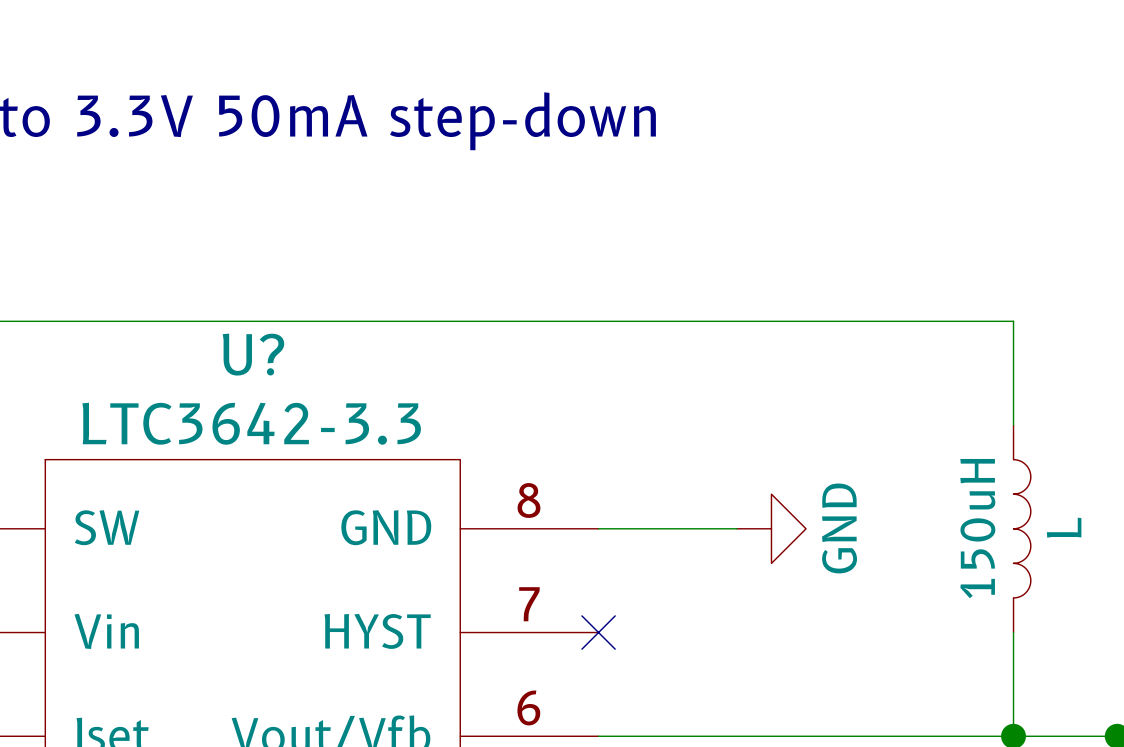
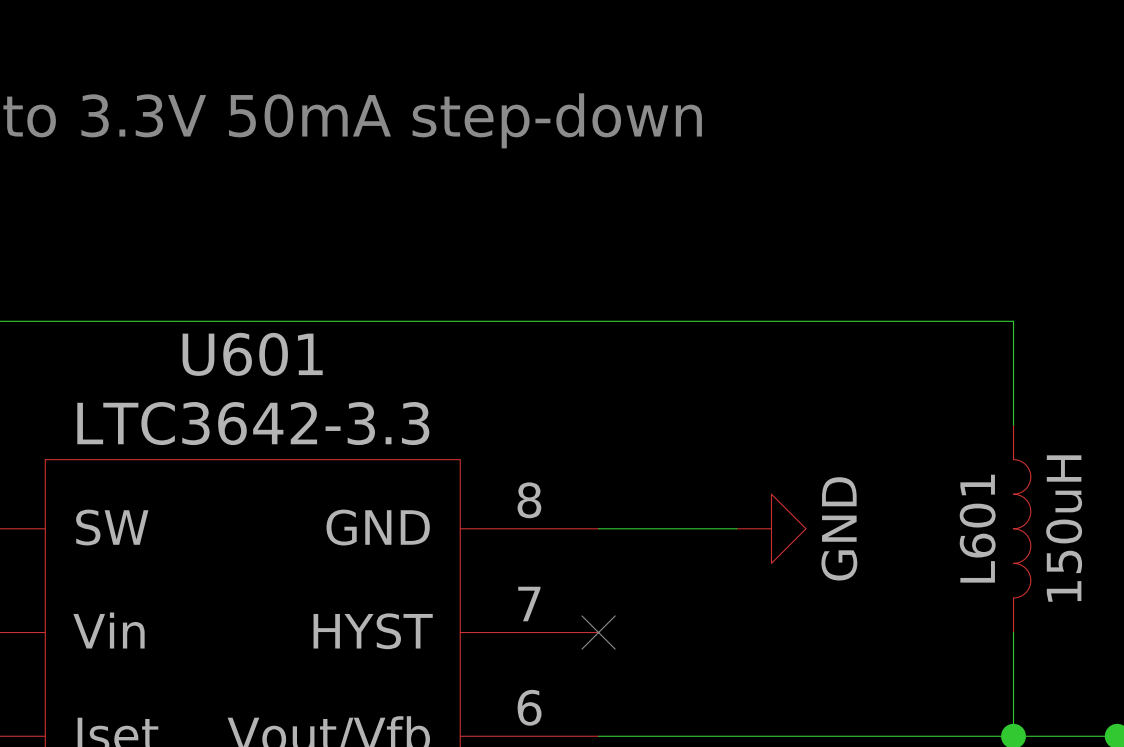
U? name: U? (253, 354) -> U601 (252, 354)
150uH value: L (1064, 527) -> 150uH (1064, 528)
150uH name: 150uH (977, 528) -> L601 (977, 528)

